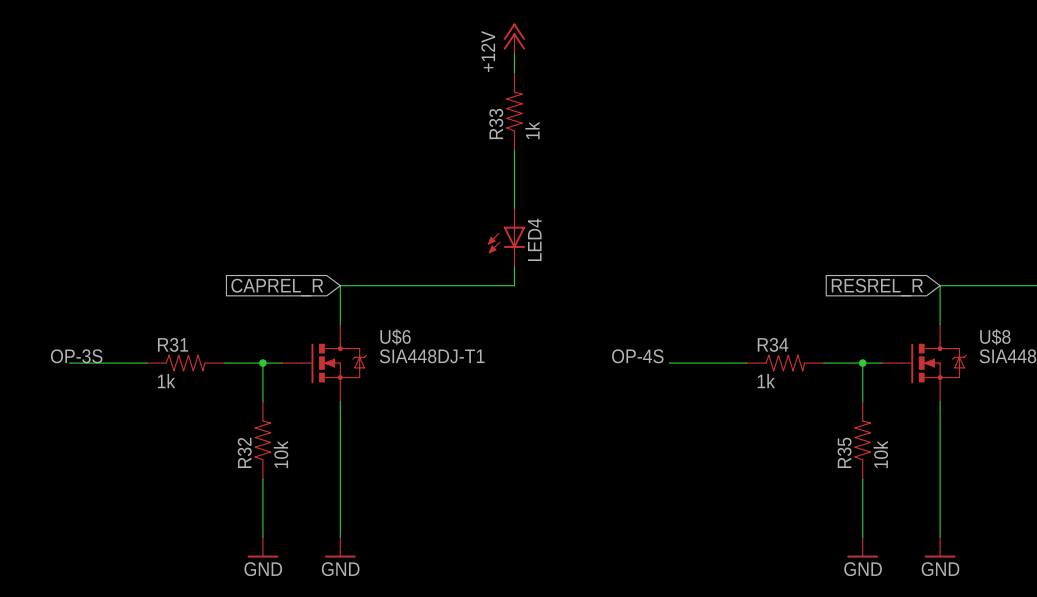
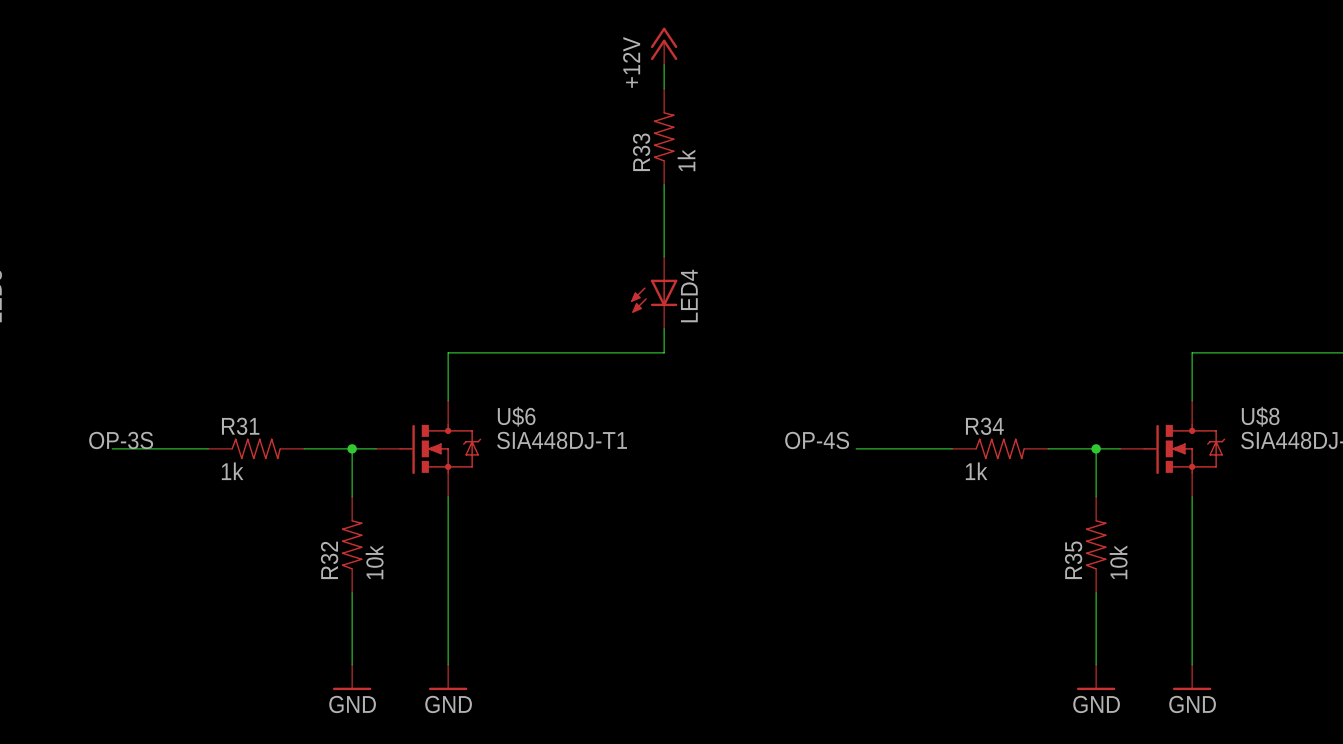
global label: CAPREL_R (277, 287) -> none
global label: RESREL_R (877, 287) -> none

